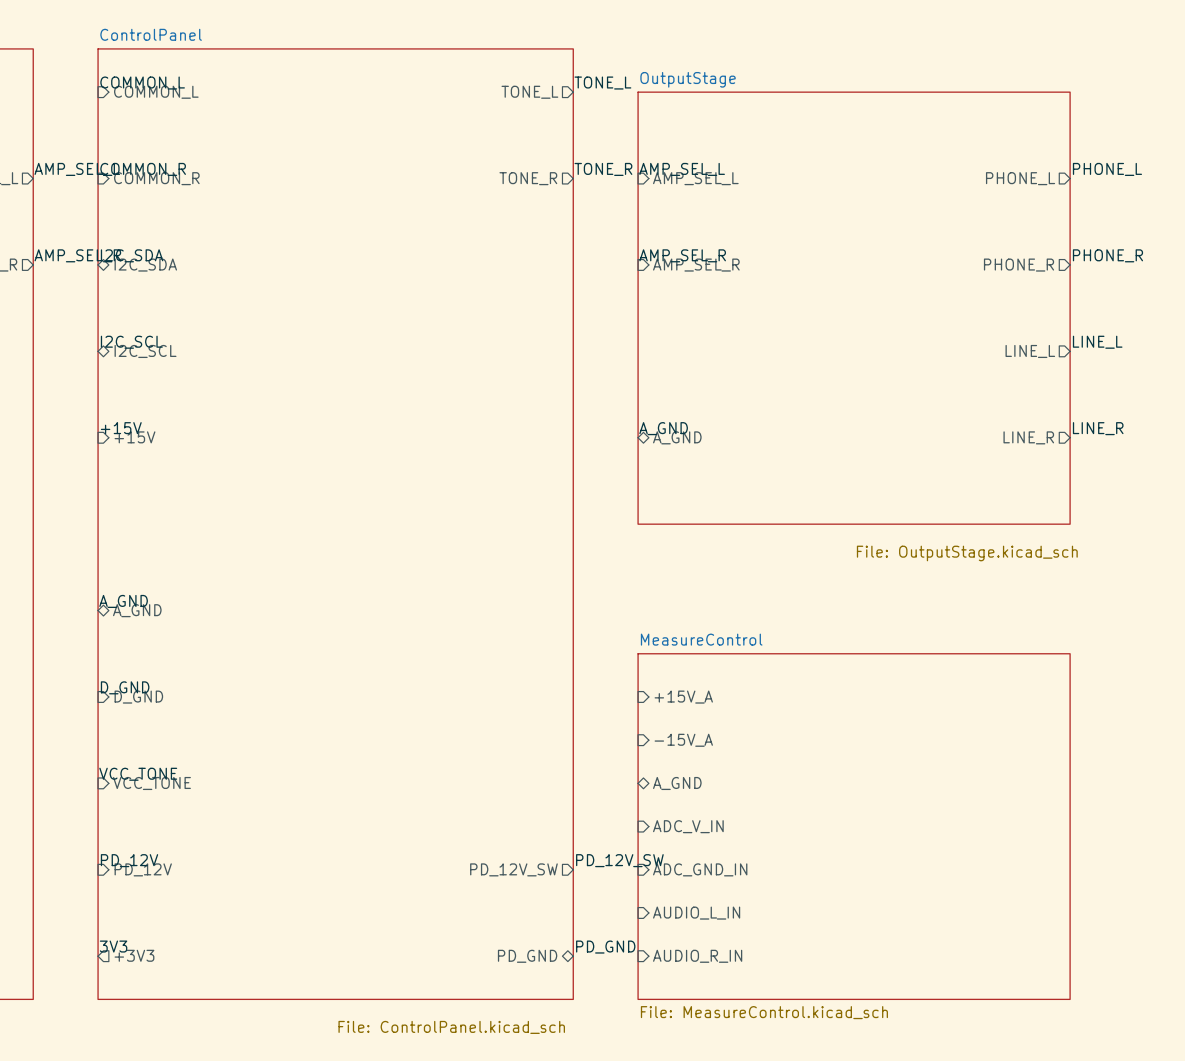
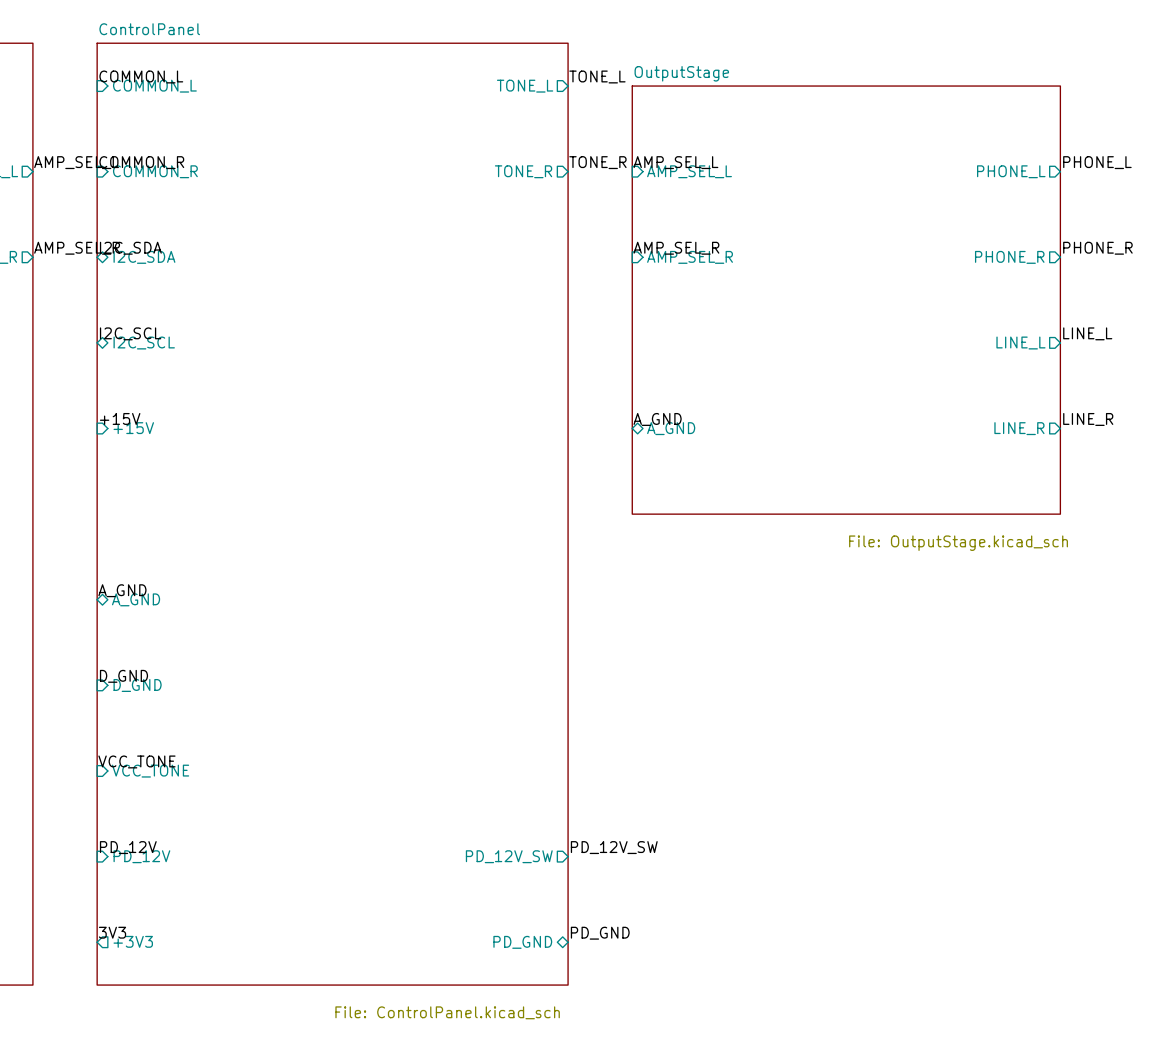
sheet pin: +15V_A (683, 697) -> none
sheet pin: -15V_A (683, 740) -> none
sheet pin: A_GND (677, 783) -> none
sheet pin: ADC_V_IN (688, 826) -> none
sheet MeasureControl: File: MeasureControl.kicad_sch (854, 826) -> none
sheet pin: ADC_GND_IN (700, 869) -> none
sheet pin: AUDIO_L_IN (696, 913) -> none
sheet pin: AUDIO_R_IN (697, 956) -> none

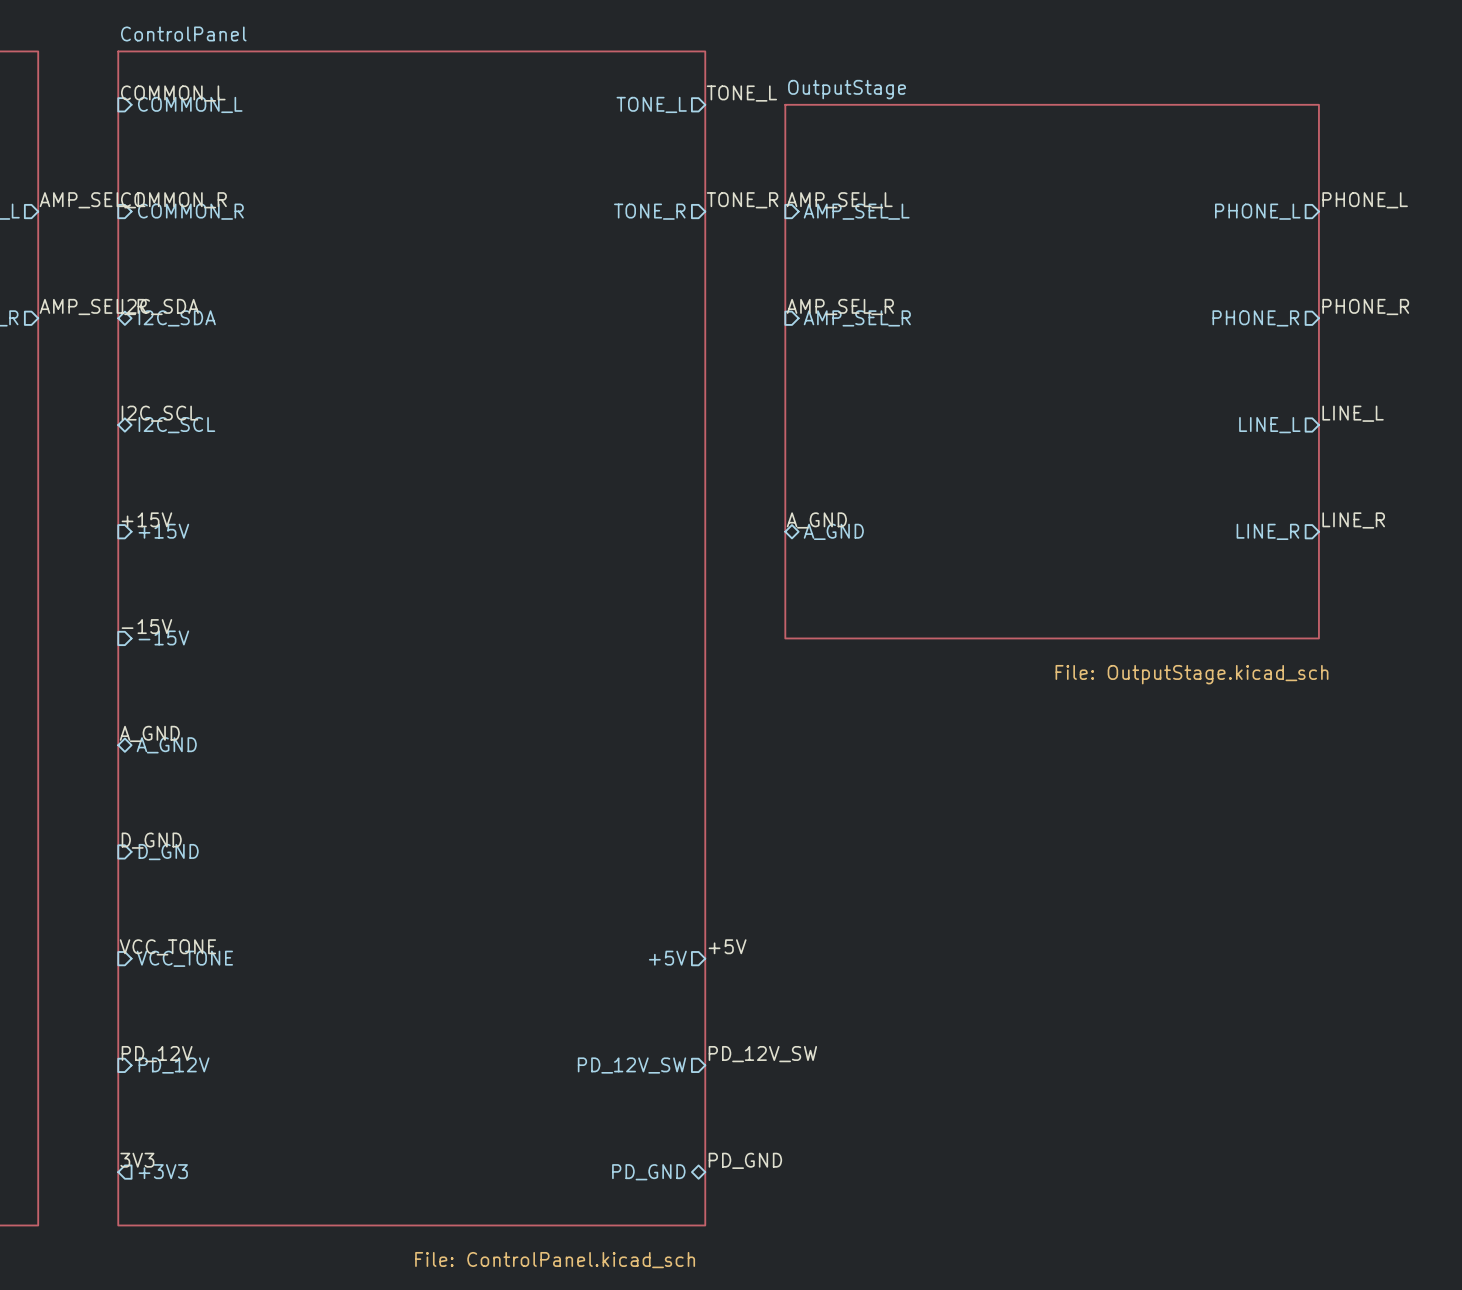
label: none -> -15V (146, 626)
sheet pin: none -> -15V (163, 637)
label: none -> +5V (727, 946)
sheet pin: none -> +5V (667, 958)

